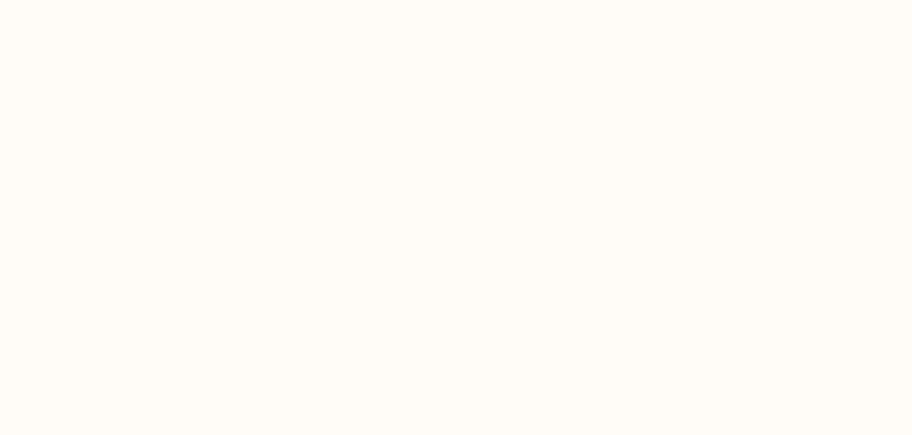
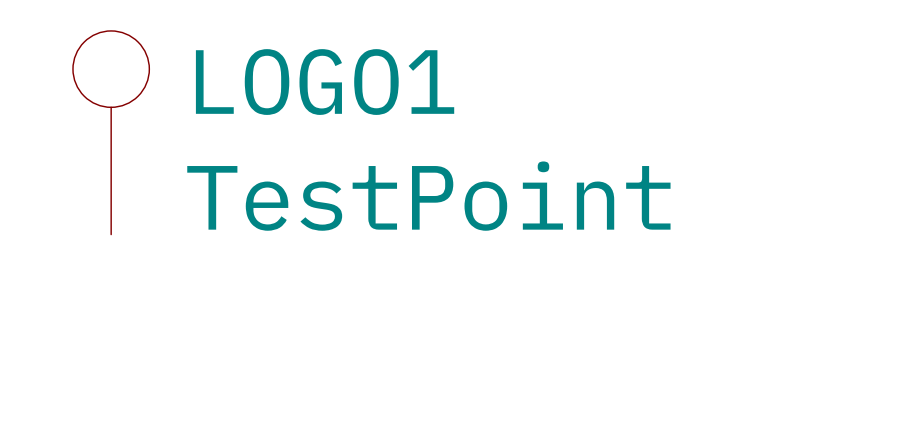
LOGO1: none -> TestPoint (111, 132)

